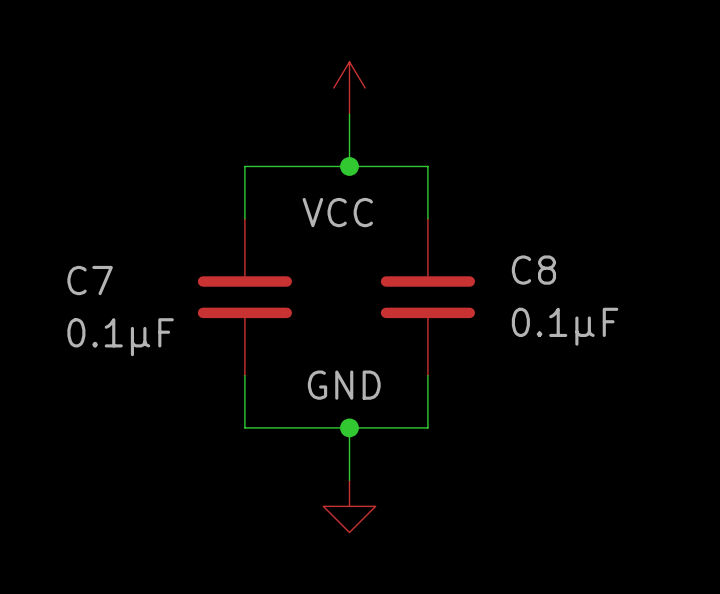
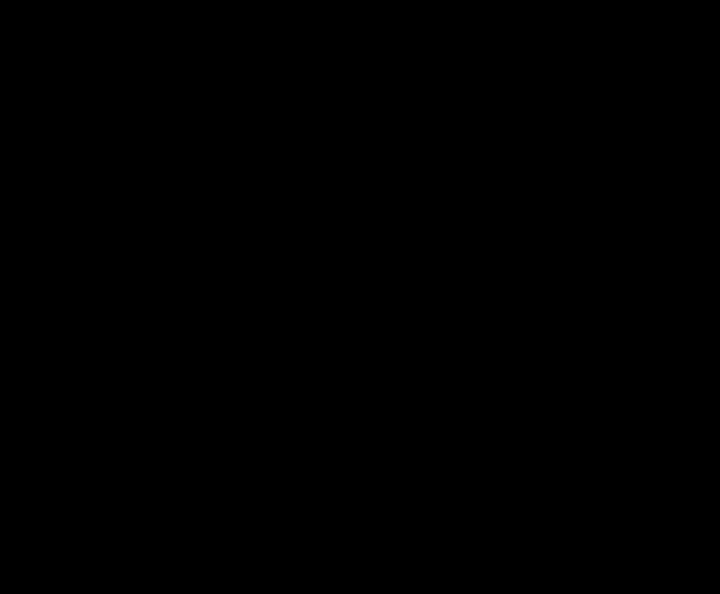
power symbol: VCC (349, 88) -> none
wire: (349, 114) (349, 166) -> none
junction: (349, 166) -> none
wire: (244, 218) (244, 166) (427, 166) (427, 218) -> none
C7: 0.1µF (244, 297) -> none
C8: 0.1µF (427, 297) -> none
wire: (244, 375) (244, 427) (427, 427) (427, 375) -> none
wire: (349, 427) (349, 480) -> none
junction: (349, 427) -> none
power symbol: GND (349, 506) -> none

